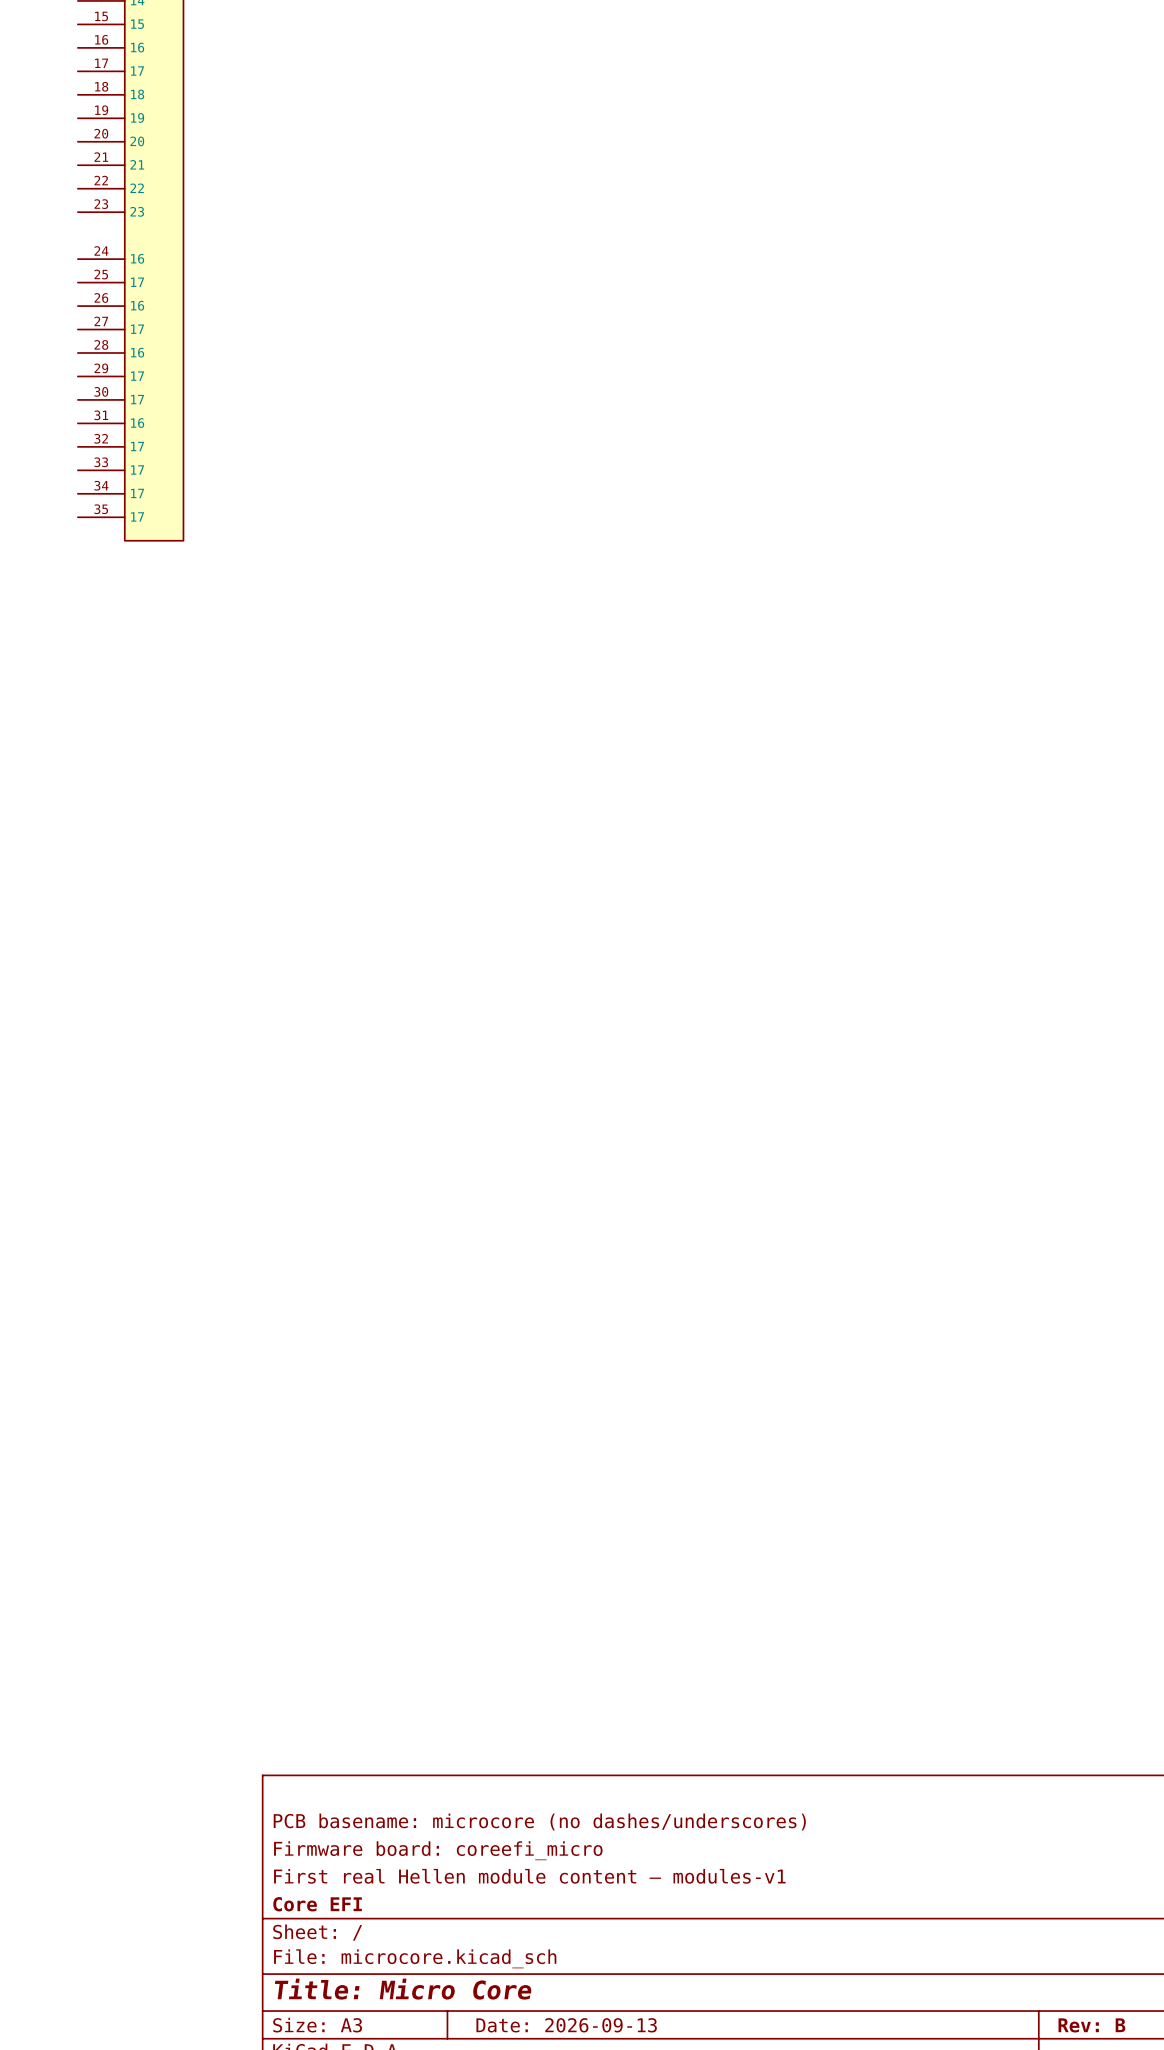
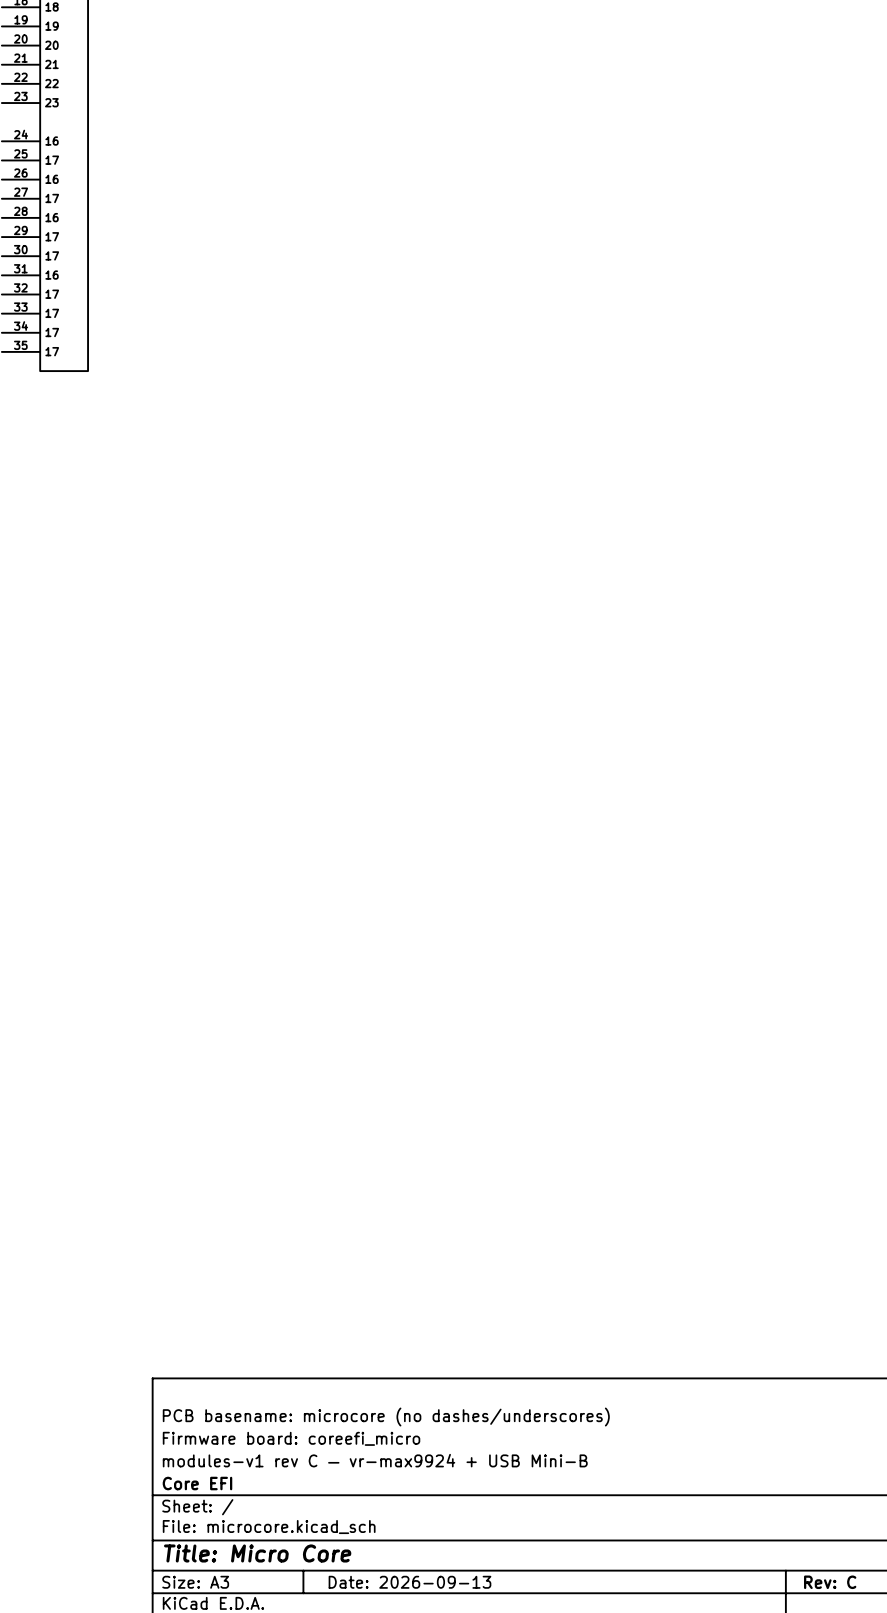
title block: First real Hellen module content — modules-v1 (529, 1876) -> modules-v1 rev C — vr-max9924 + USB Mini-B (375, 1460)
title block: Rev: B (1091, 2025) -> Rev: C (830, 1582)

